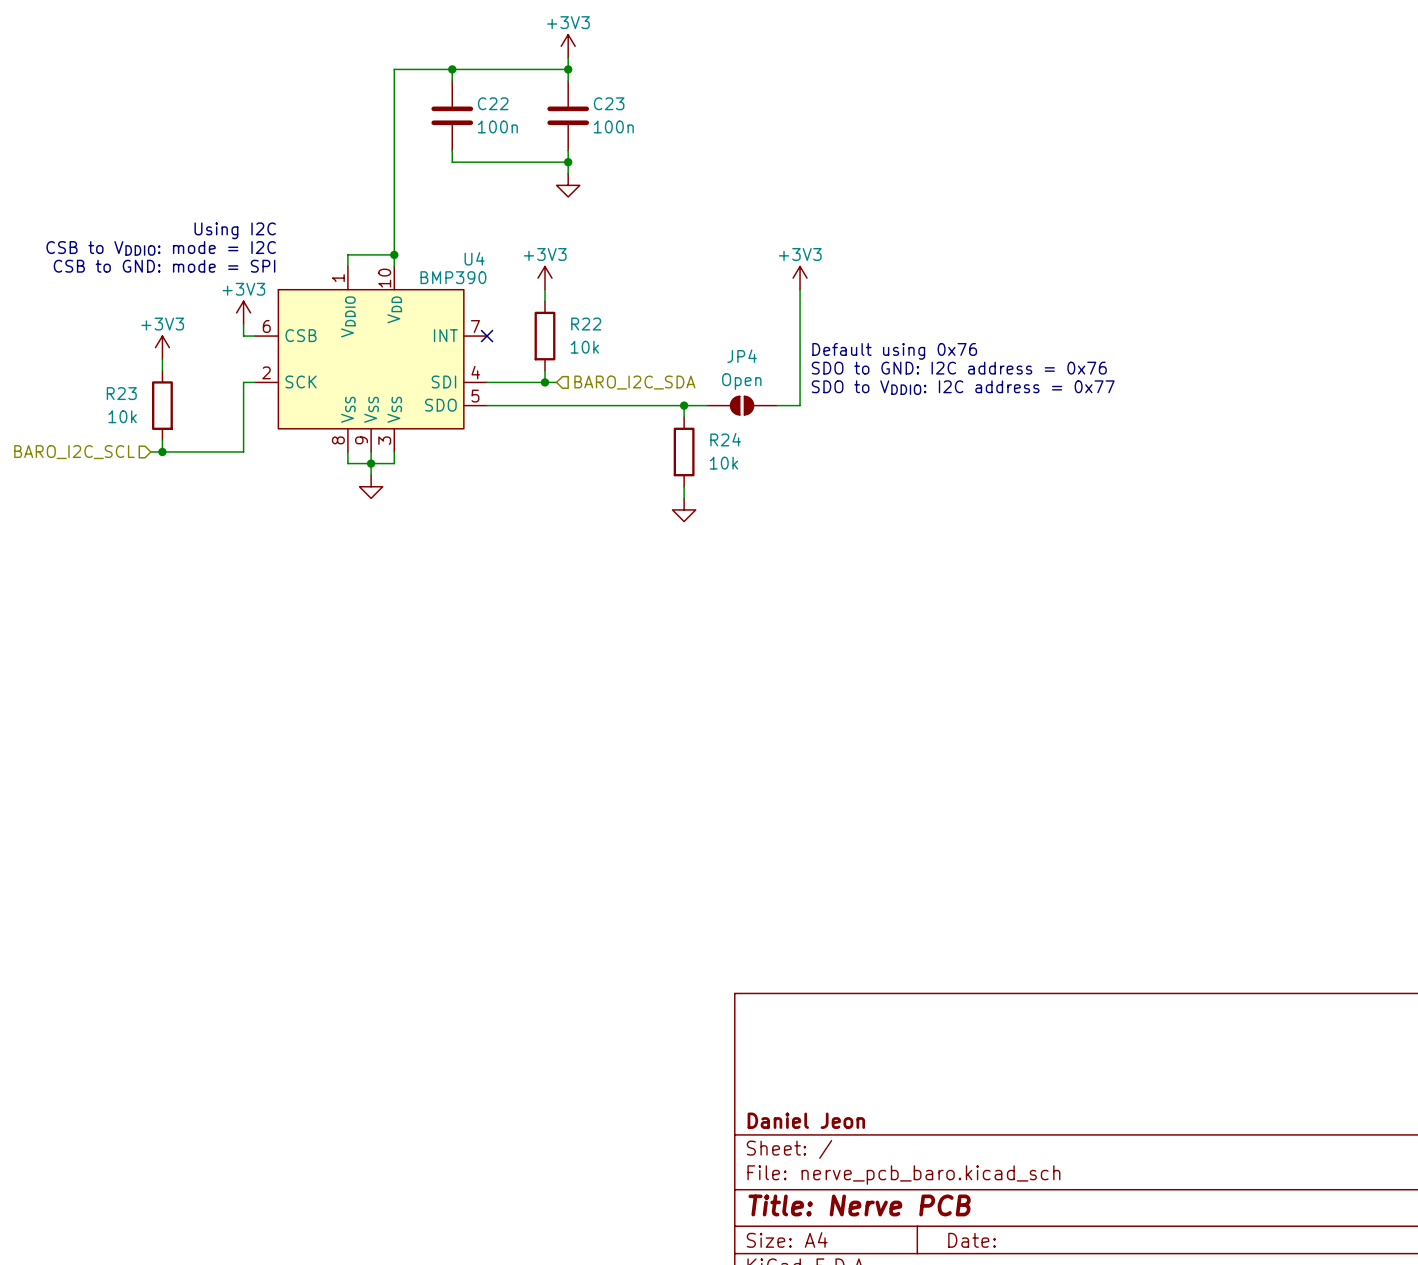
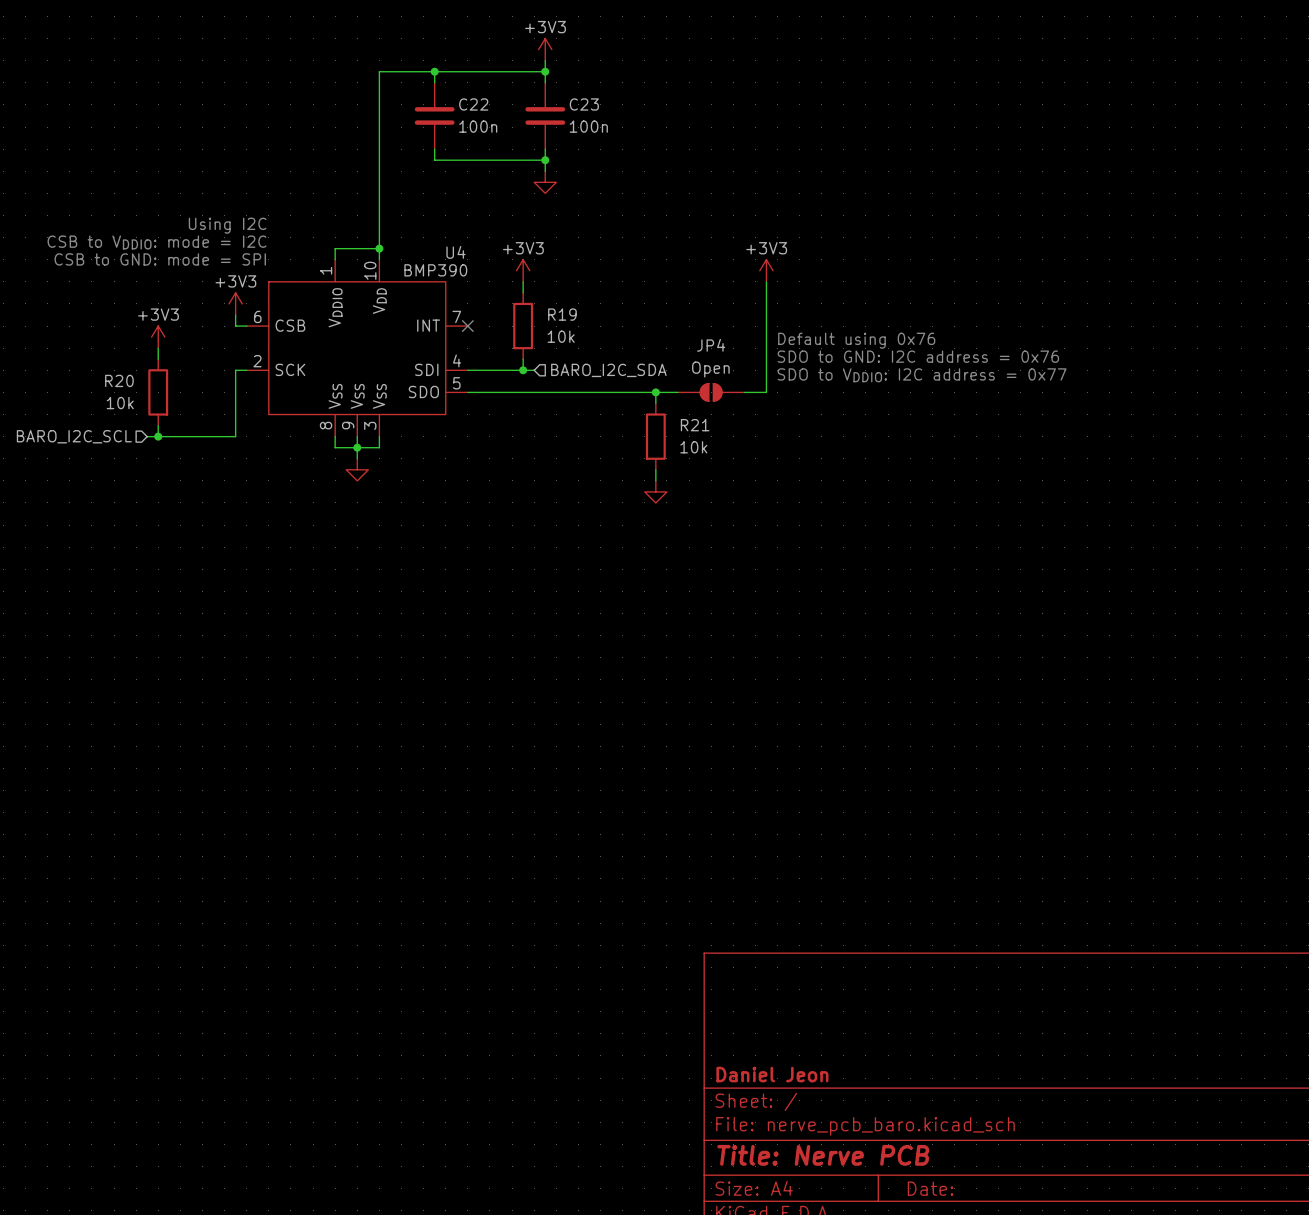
R22 name: R22 (586, 324) -> R19 (562, 314)
R23 name: R23 (121, 393) -> R20 (119, 380)
R24 name: R24 (725, 439) -> R21 (695, 425)

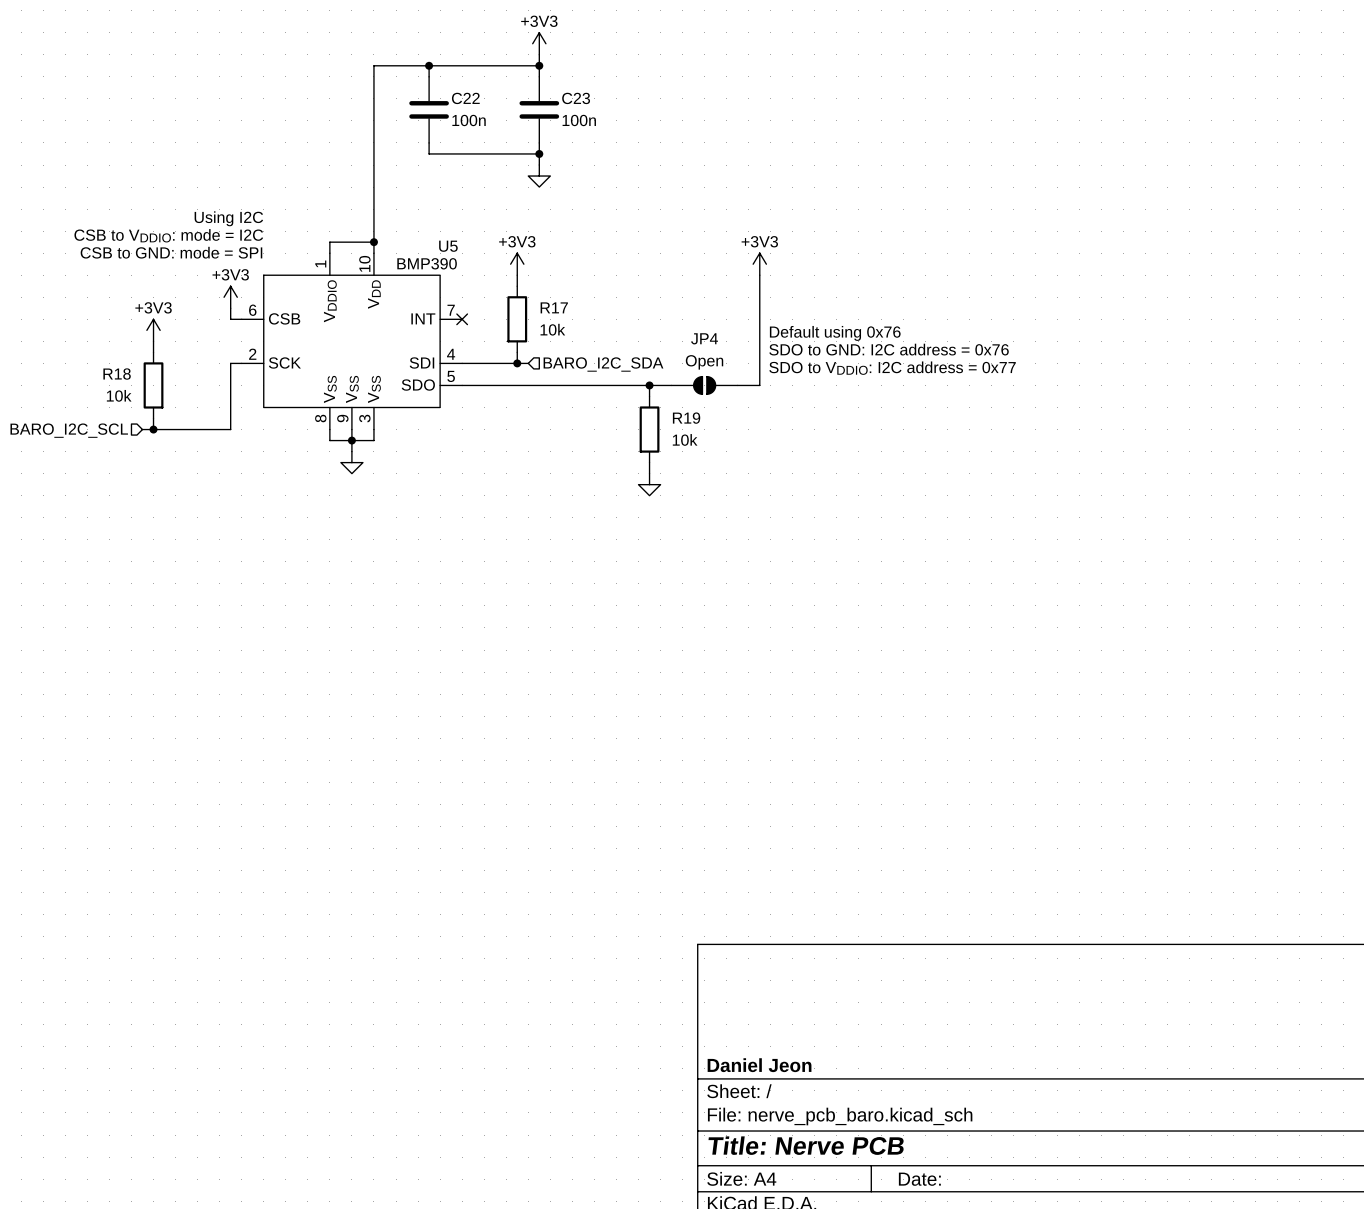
U4 name: U4 (455, 252) -> U5 (448, 246)
R19 name: R19 (562, 314) -> R17 (554, 307)
R20 name: R20 (119, 380) -> R18 (117, 374)
R21 name: R21 (695, 425) -> R19 (686, 418)

